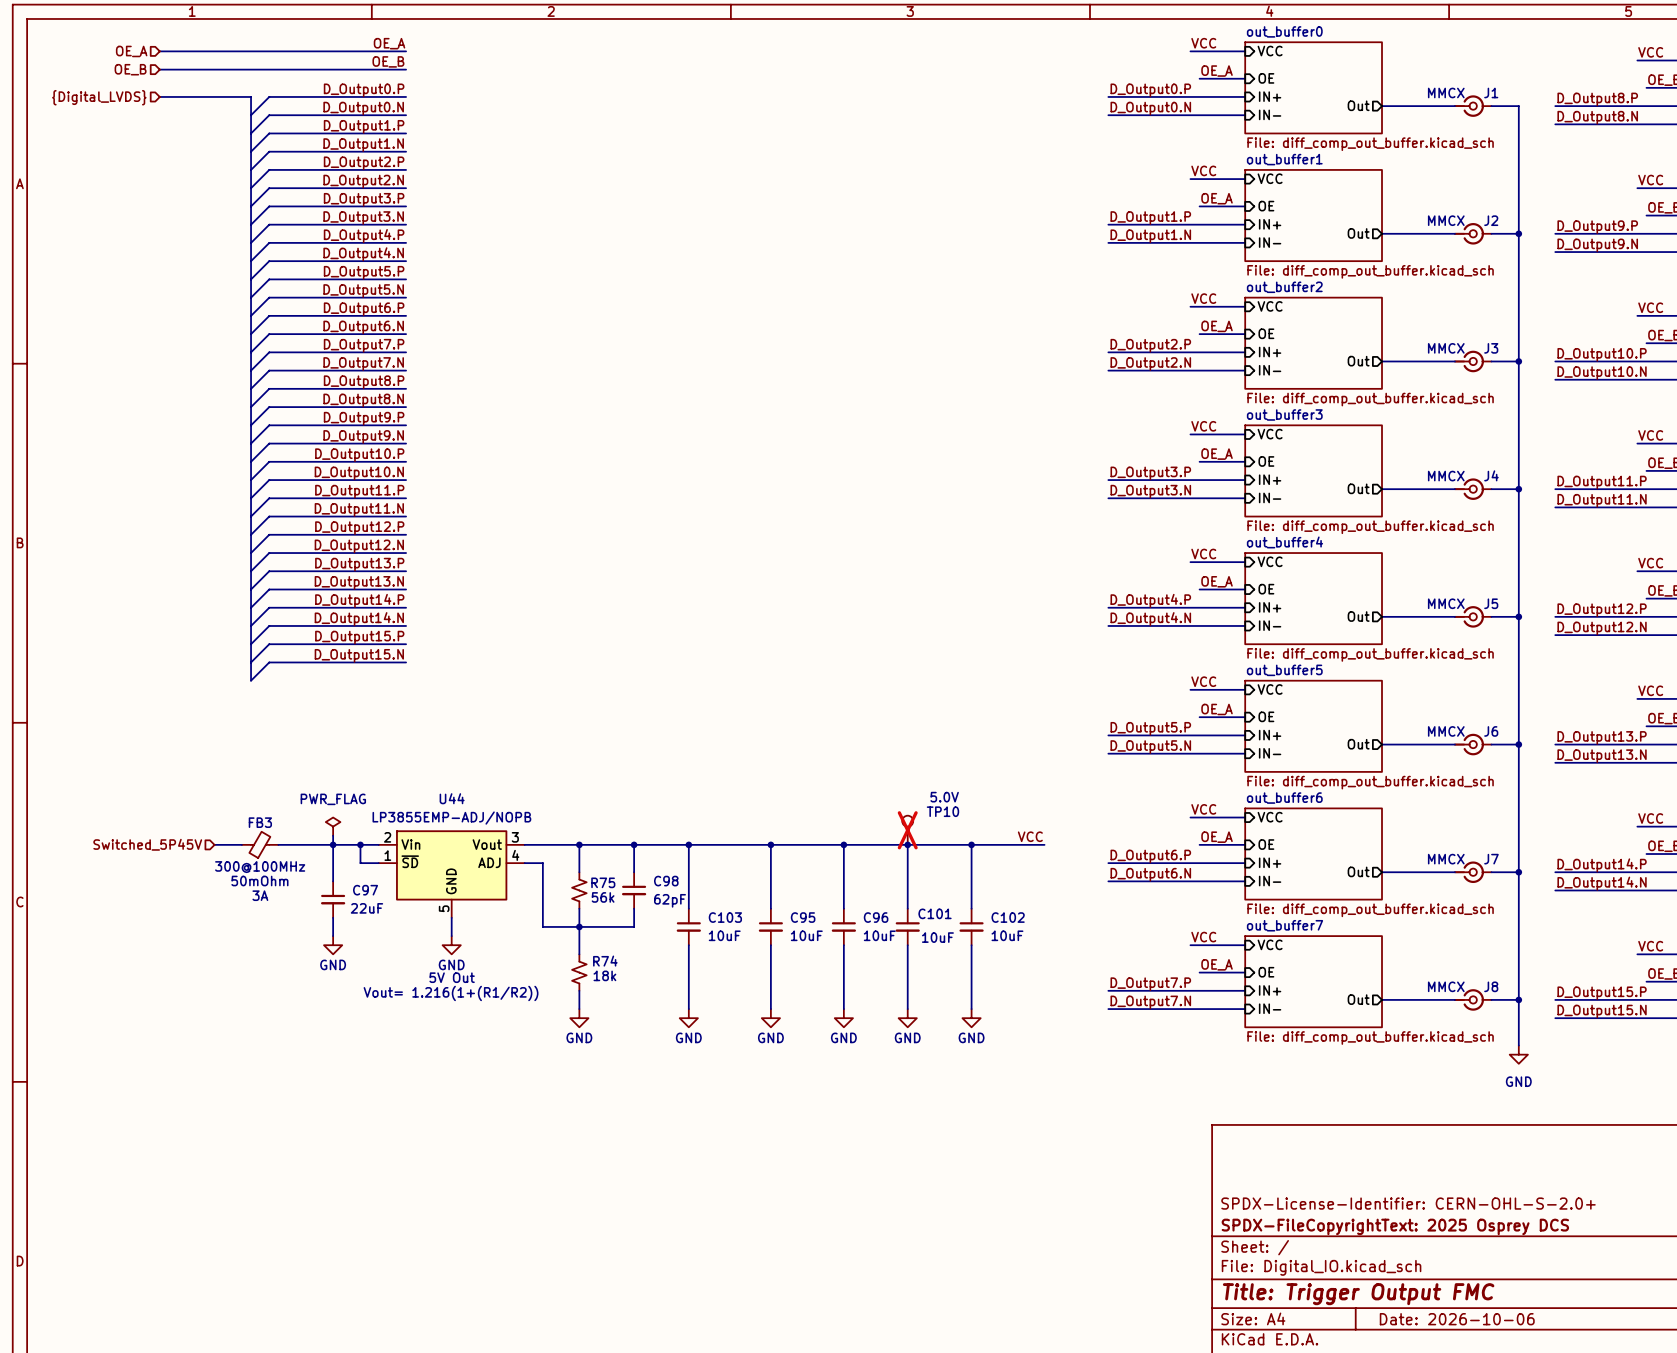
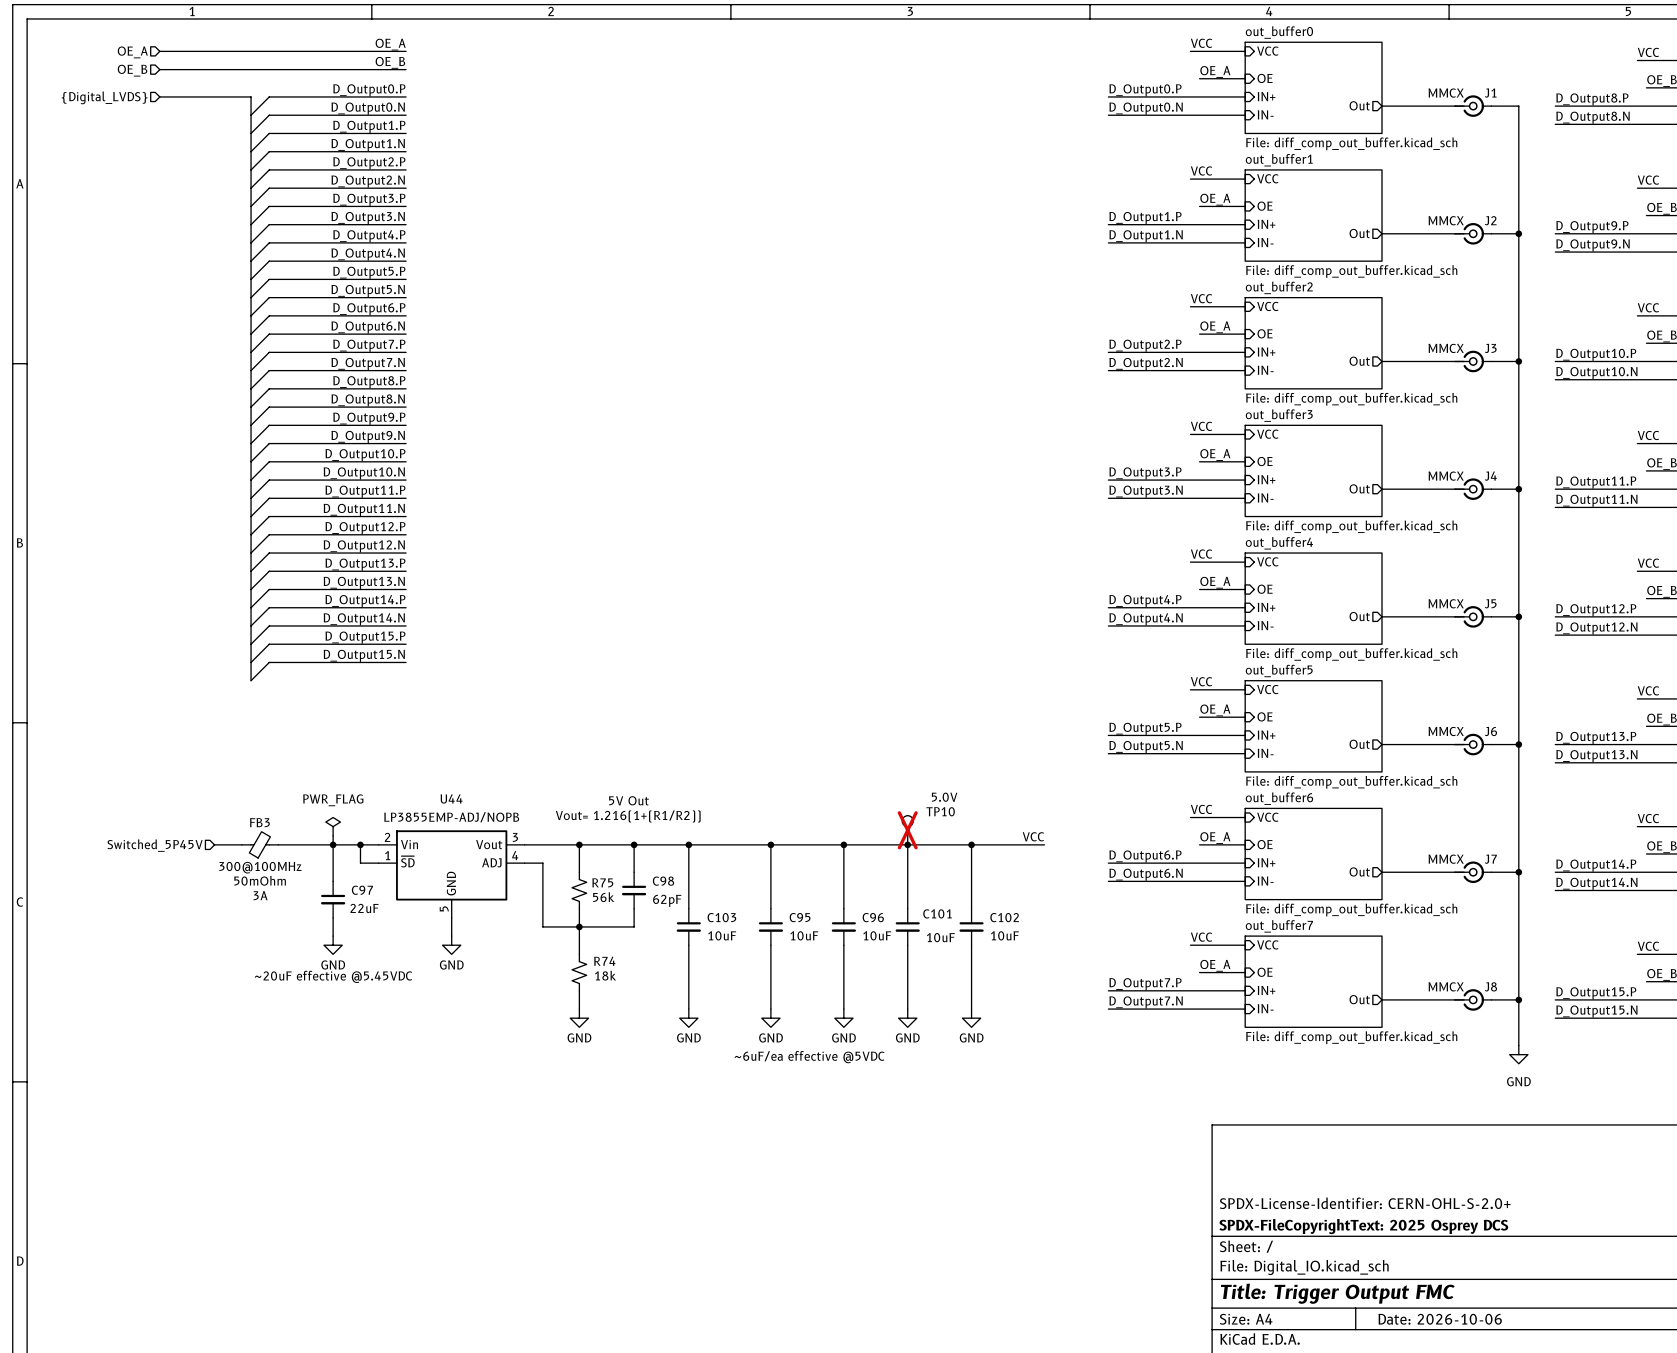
text: none -> 5V Out (629, 800)
text: none -> Vout= 1.216(1+(R1/R2)) (628, 816)
text: none -> ~20uF effective @5.45VDC (333, 976)
text: 5V Out (452, 977) -> none
text: Vout= 1.216(1+(R1/R2)) (451, 993) -> none
text: none -> ~6uF/ea effective @5VDC (809, 1057)

